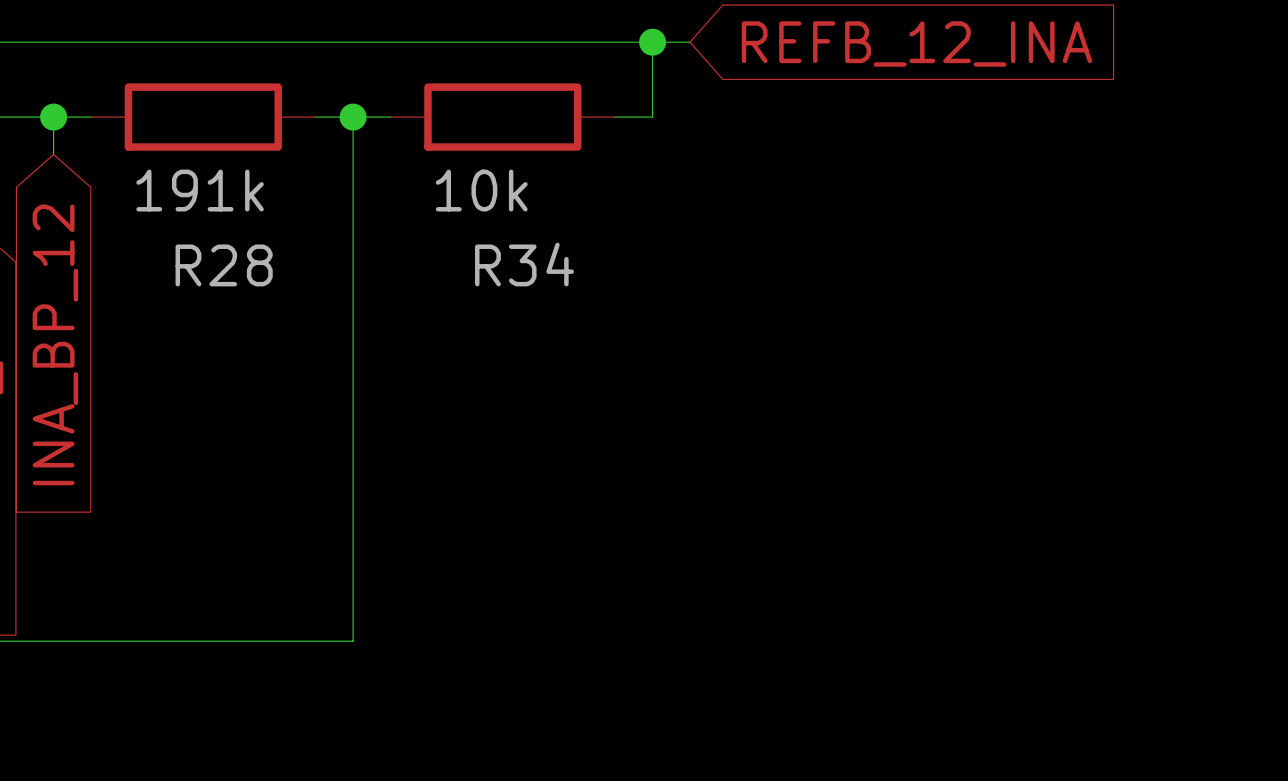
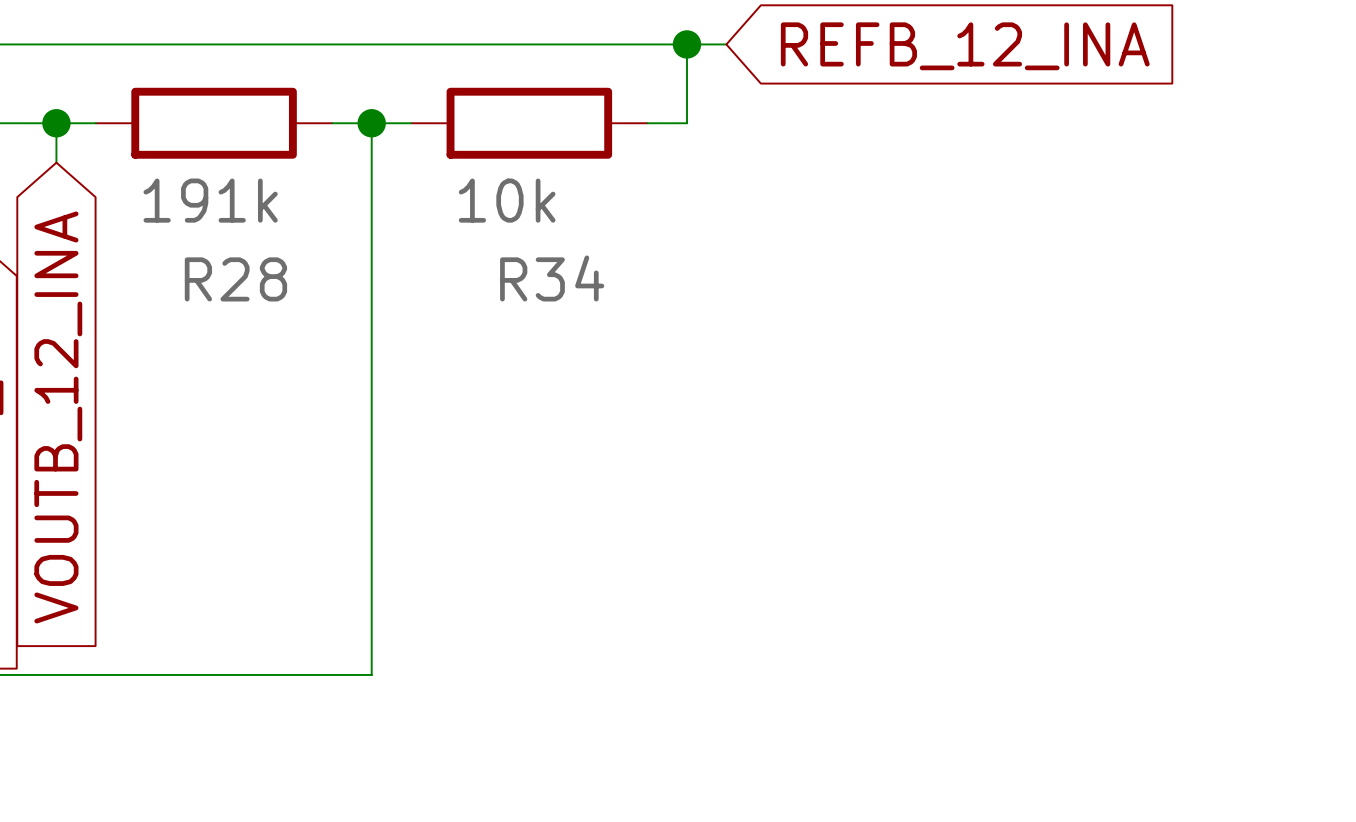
global label: INA_BP_12 (55, 344) -> VOUTB_12_INA (58, 417)

